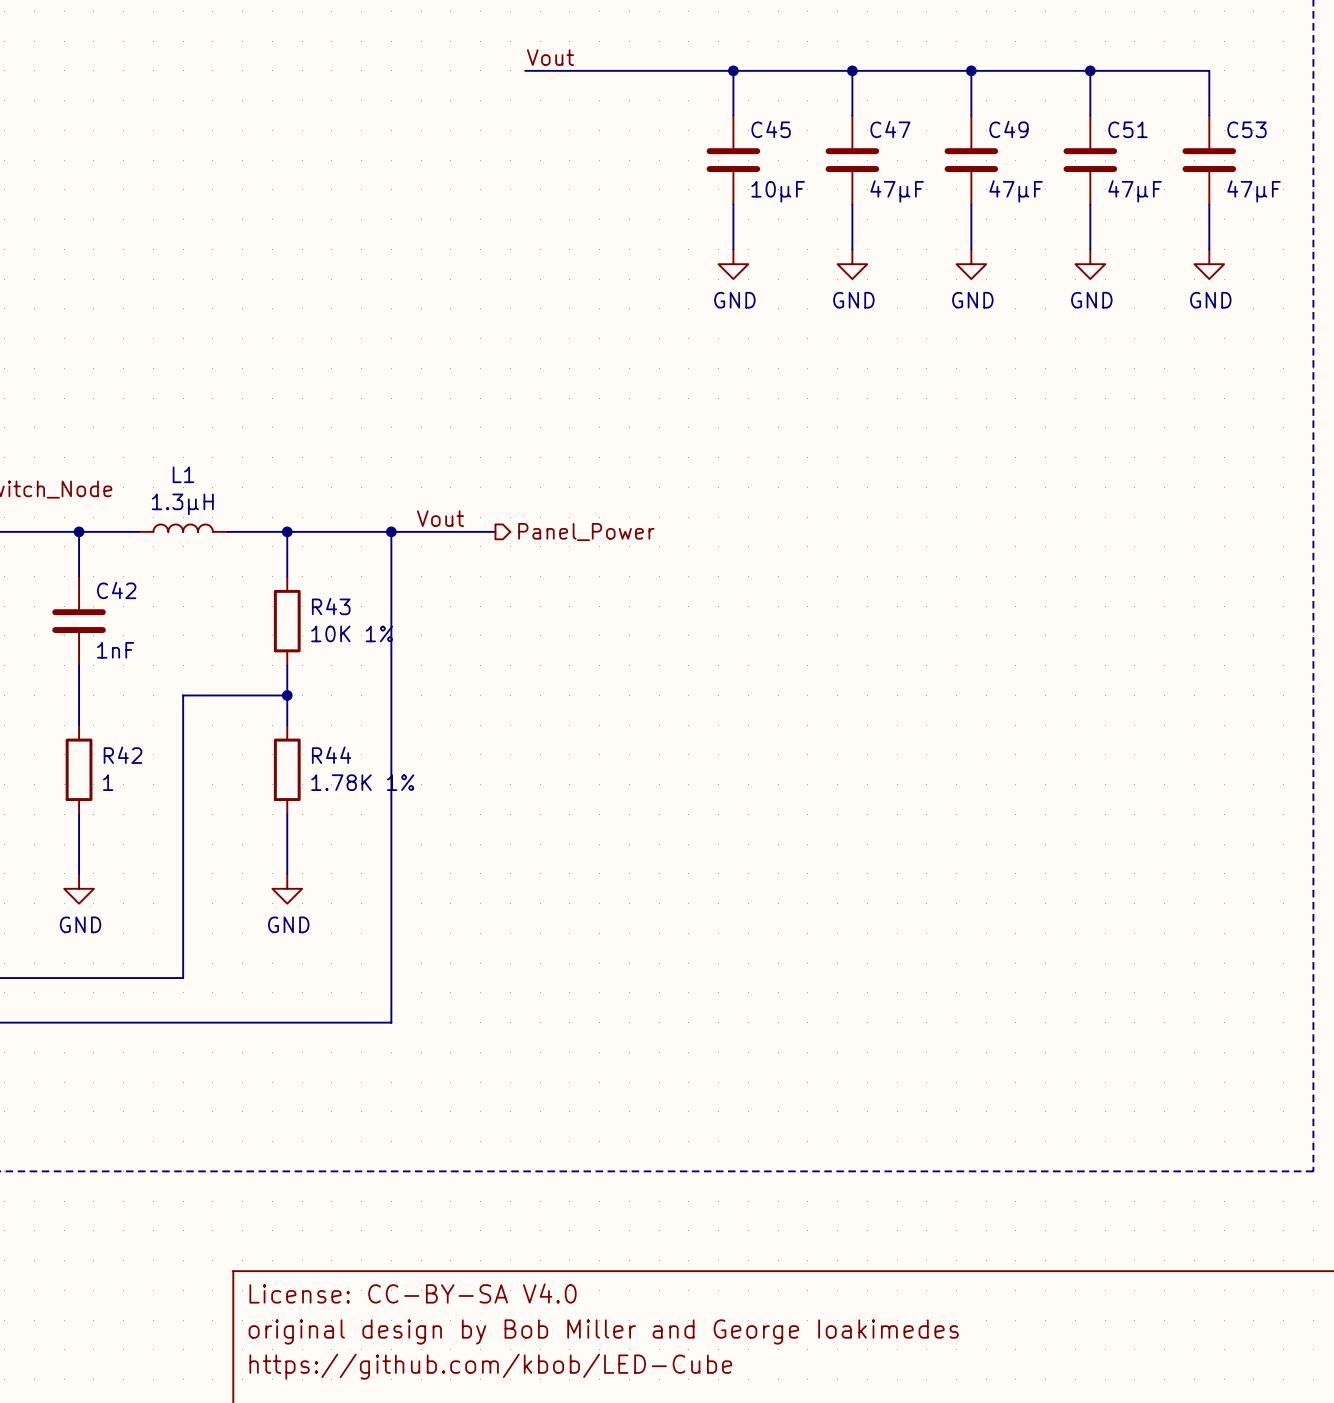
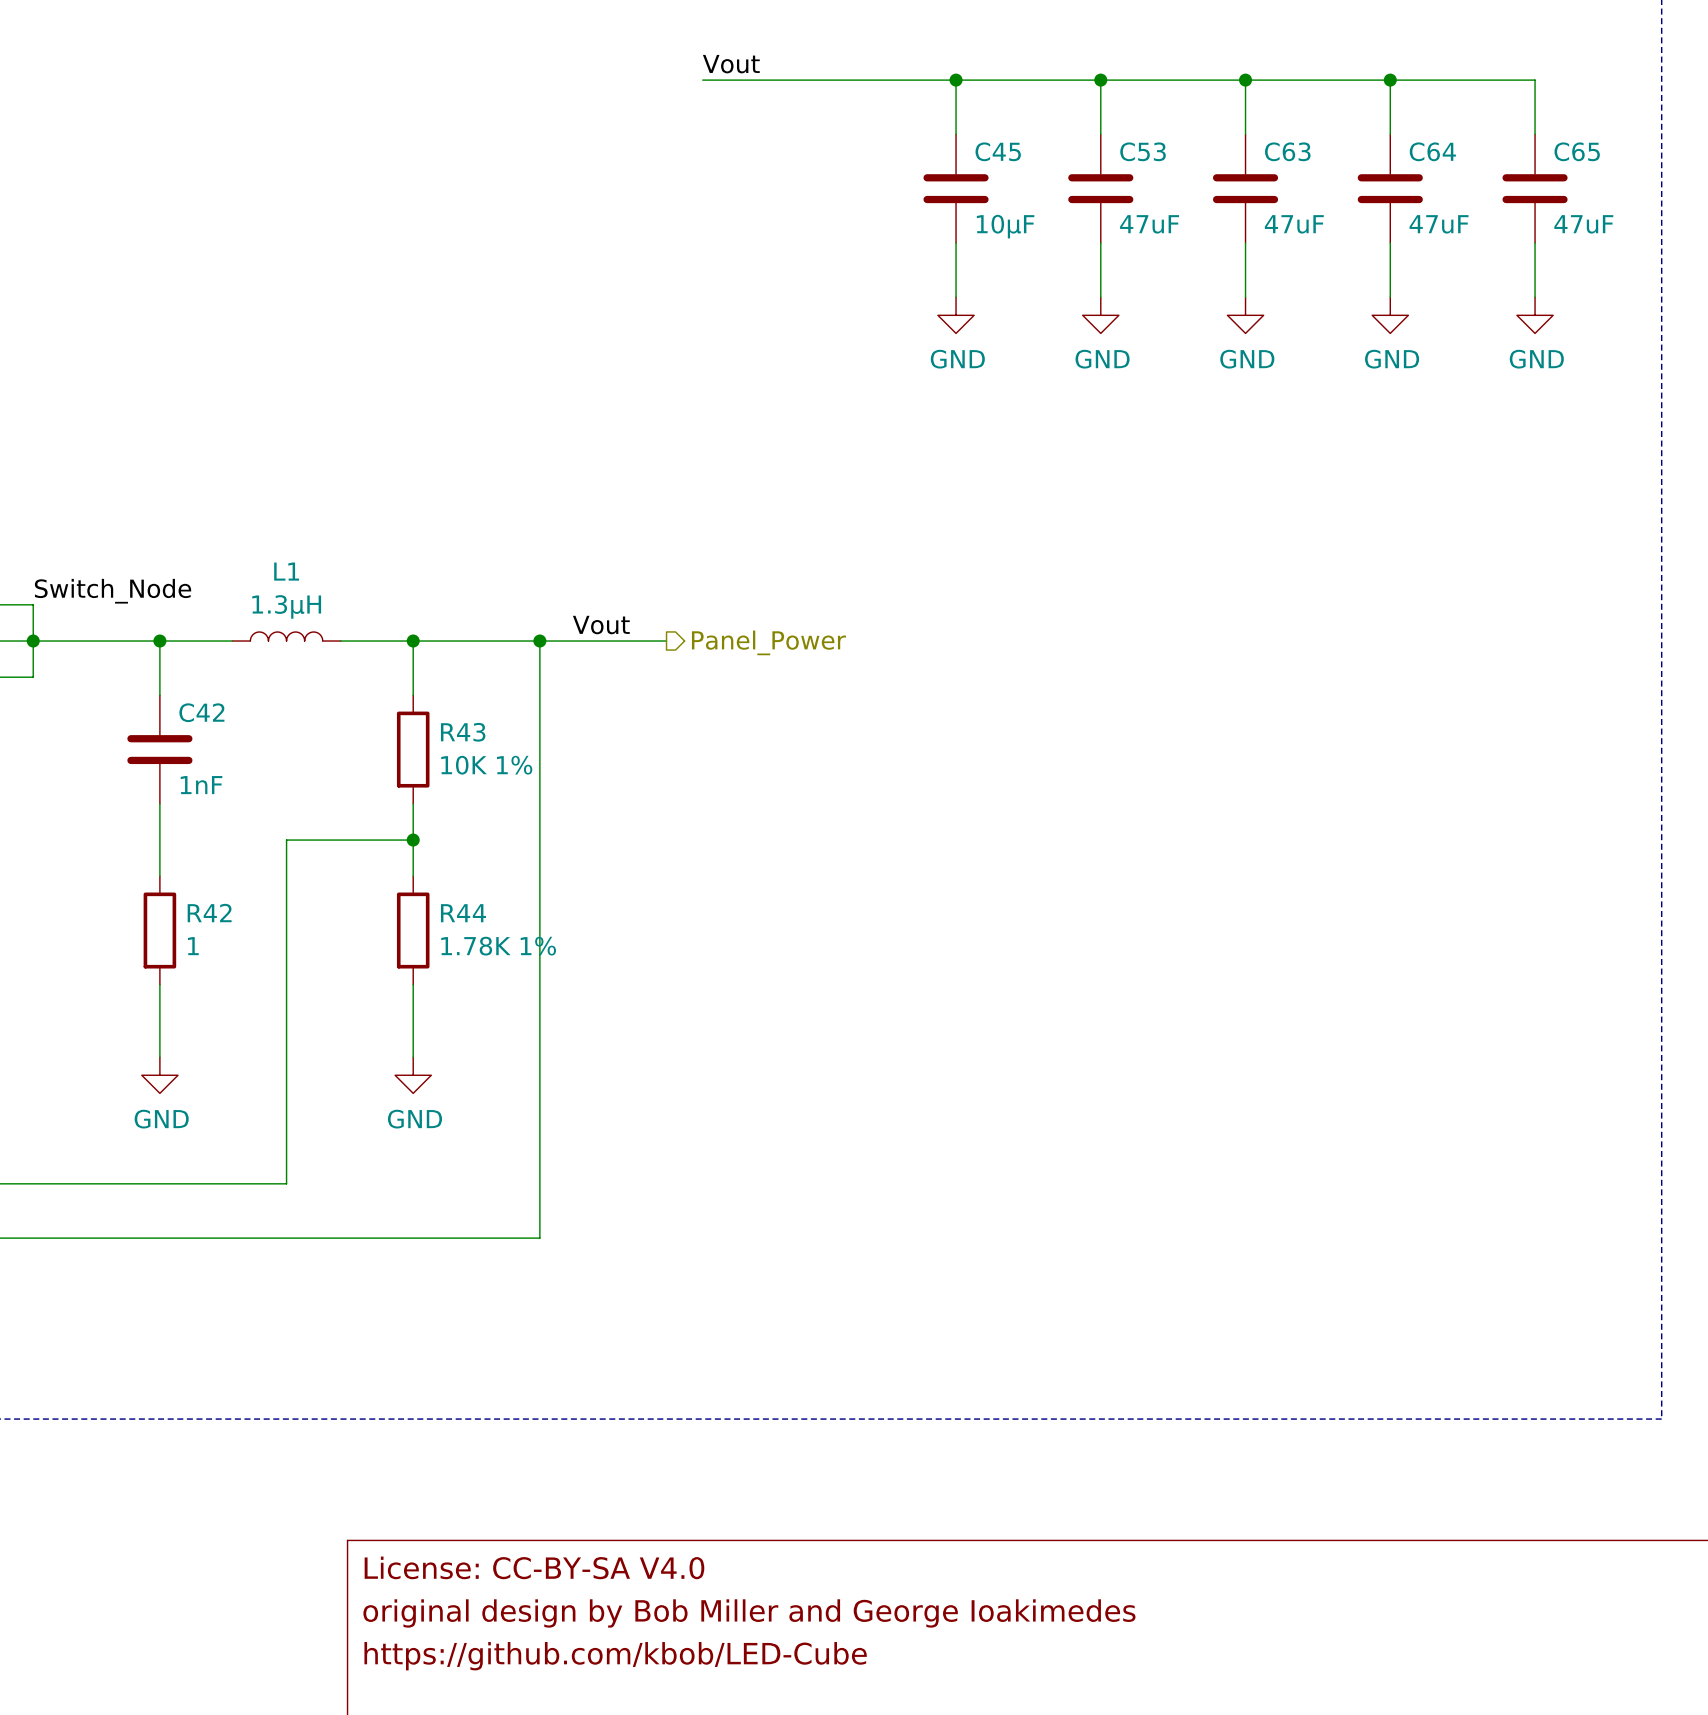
C47 name: C47 (890, 129) -> C53 (1143, 151)
C49 name: C49 (1009, 129) -> C63 (1287, 151)
C51 name: C51 (1127, 129) -> C64 (1432, 151)
C53 name: C53 (1246, 129) -> C65 (1577, 151)
C47 value: 47µF (897, 191) -> 47uF (1149, 224)
C49 value: 47µF (1016, 191) -> 47uF (1294, 224)
C51 value: 47µF (1135, 191) -> 47uF (1439, 224)
C53 value: 47µF (1254, 191) -> 47uF (1583, 224)

